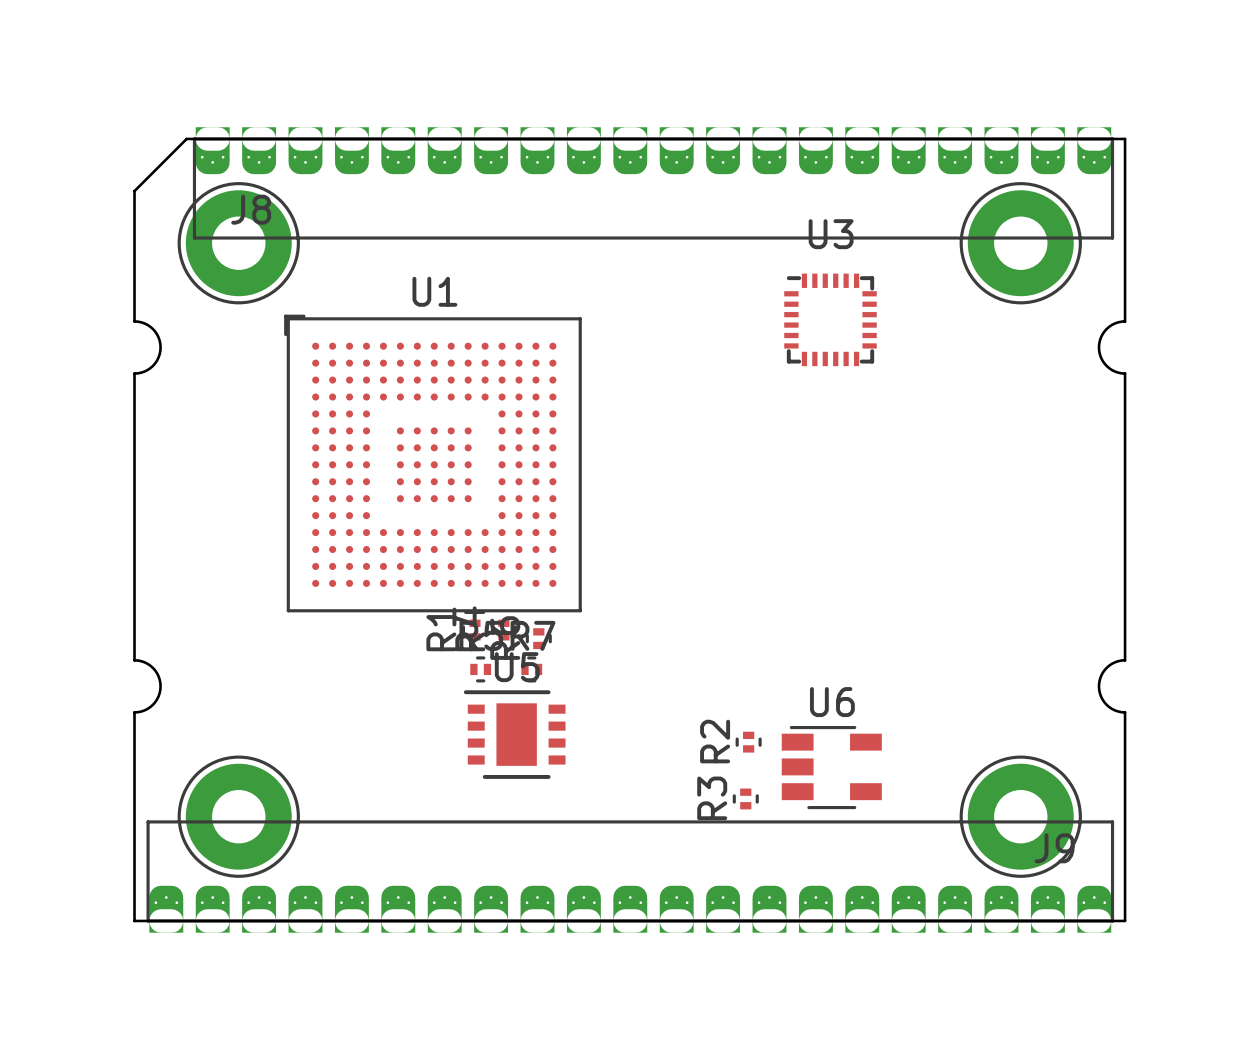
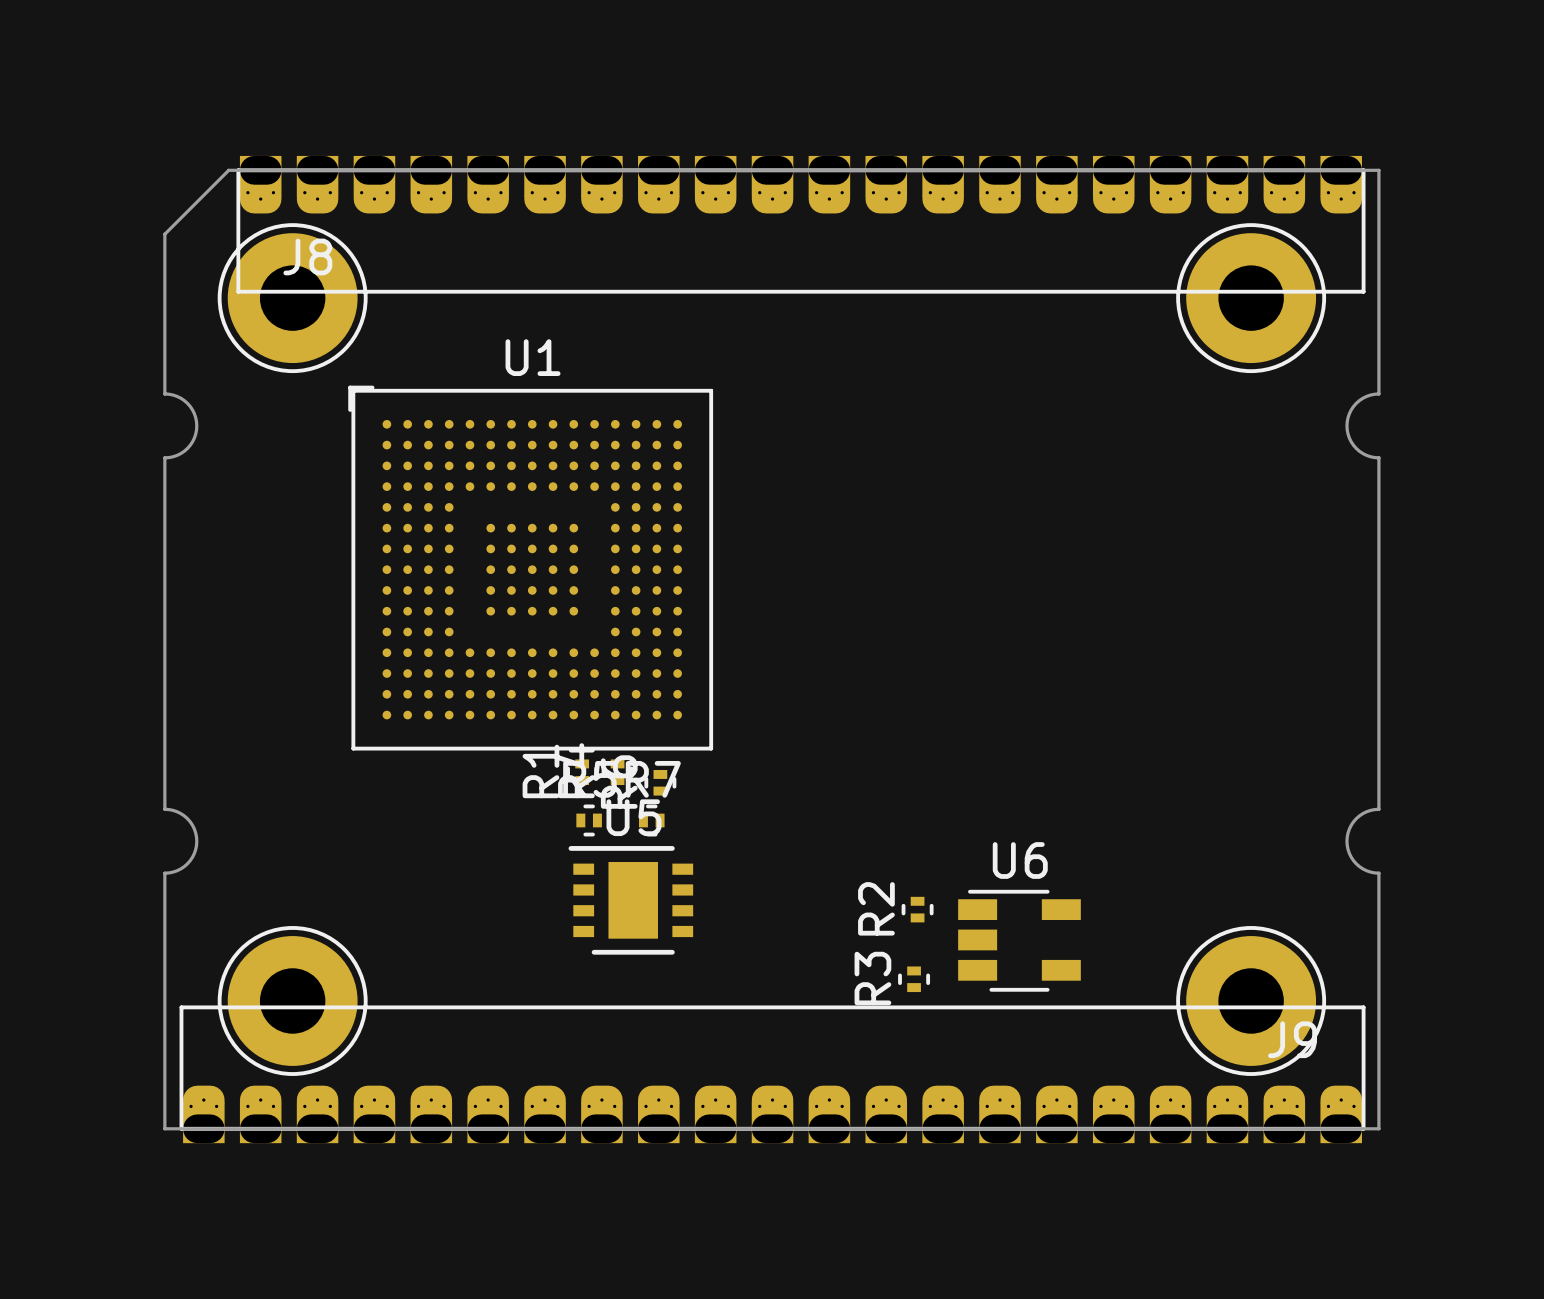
U3: (830, 319) -> none

